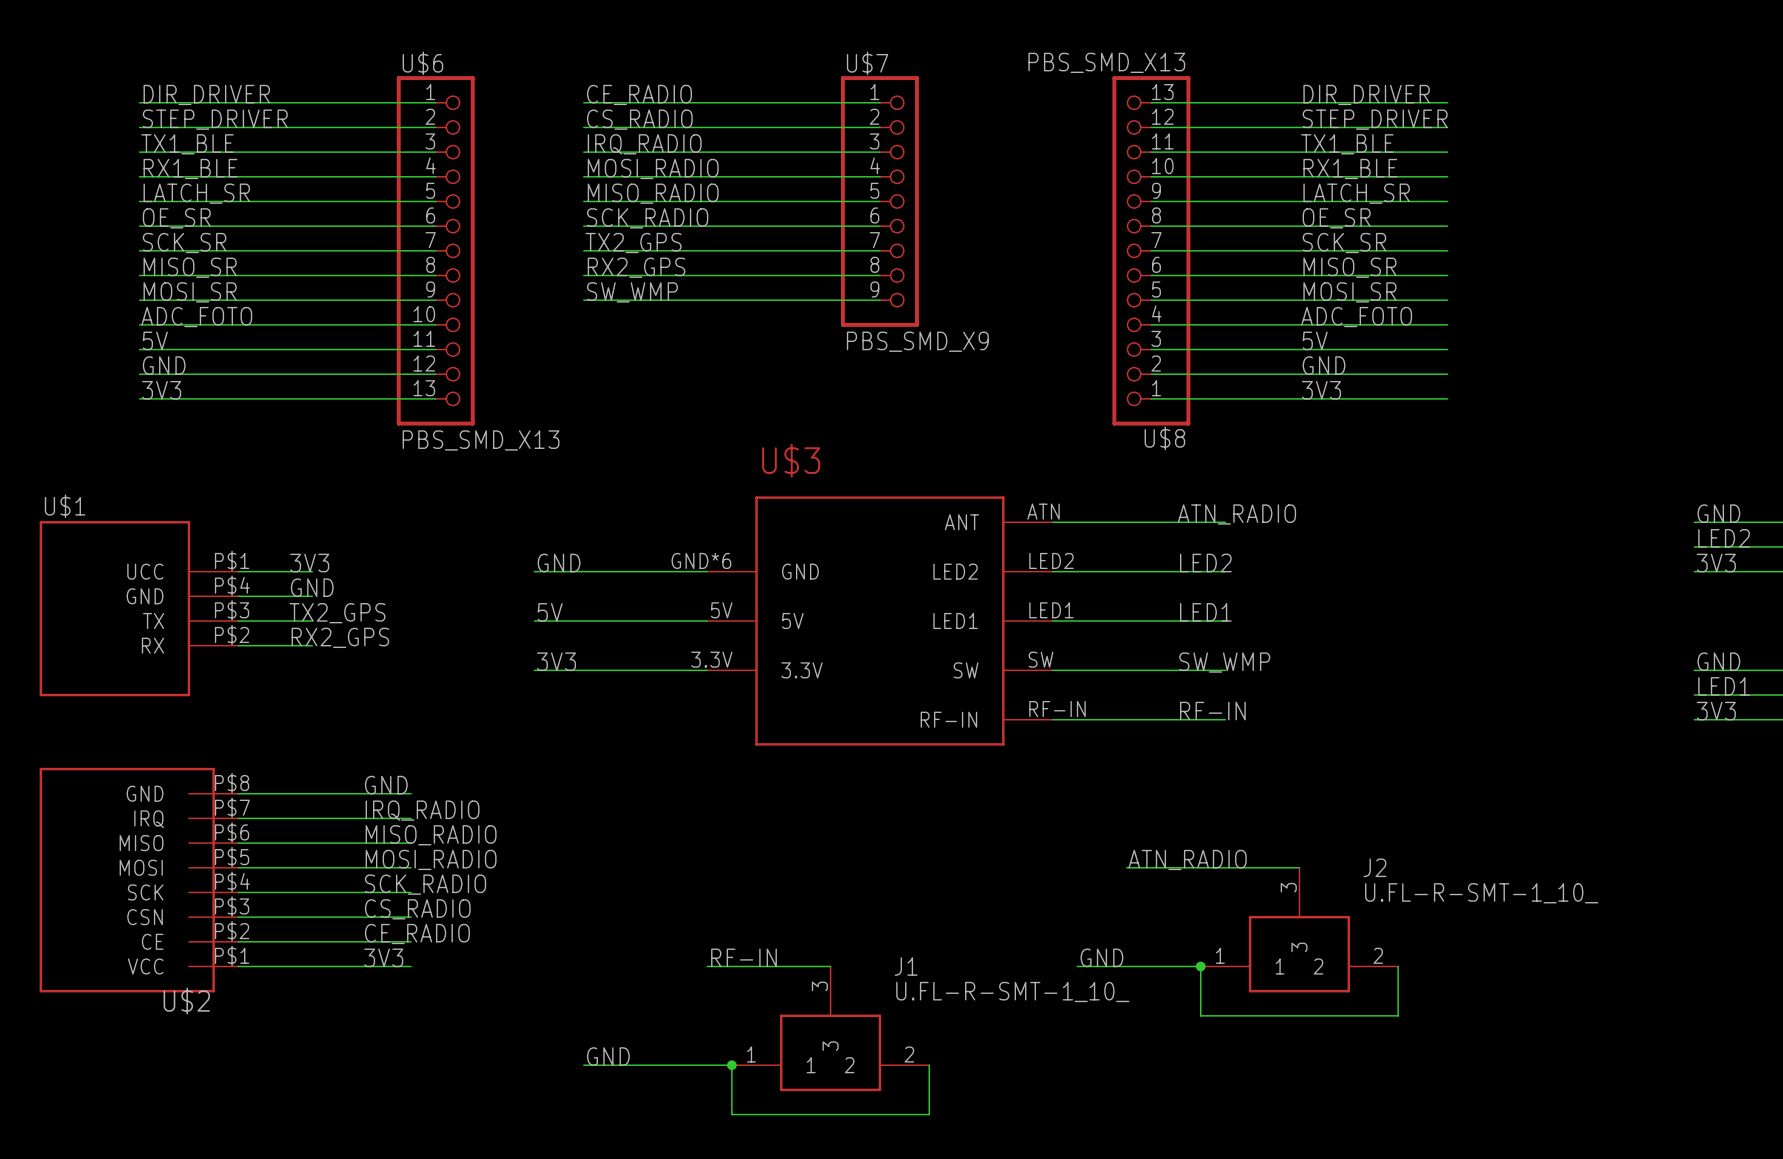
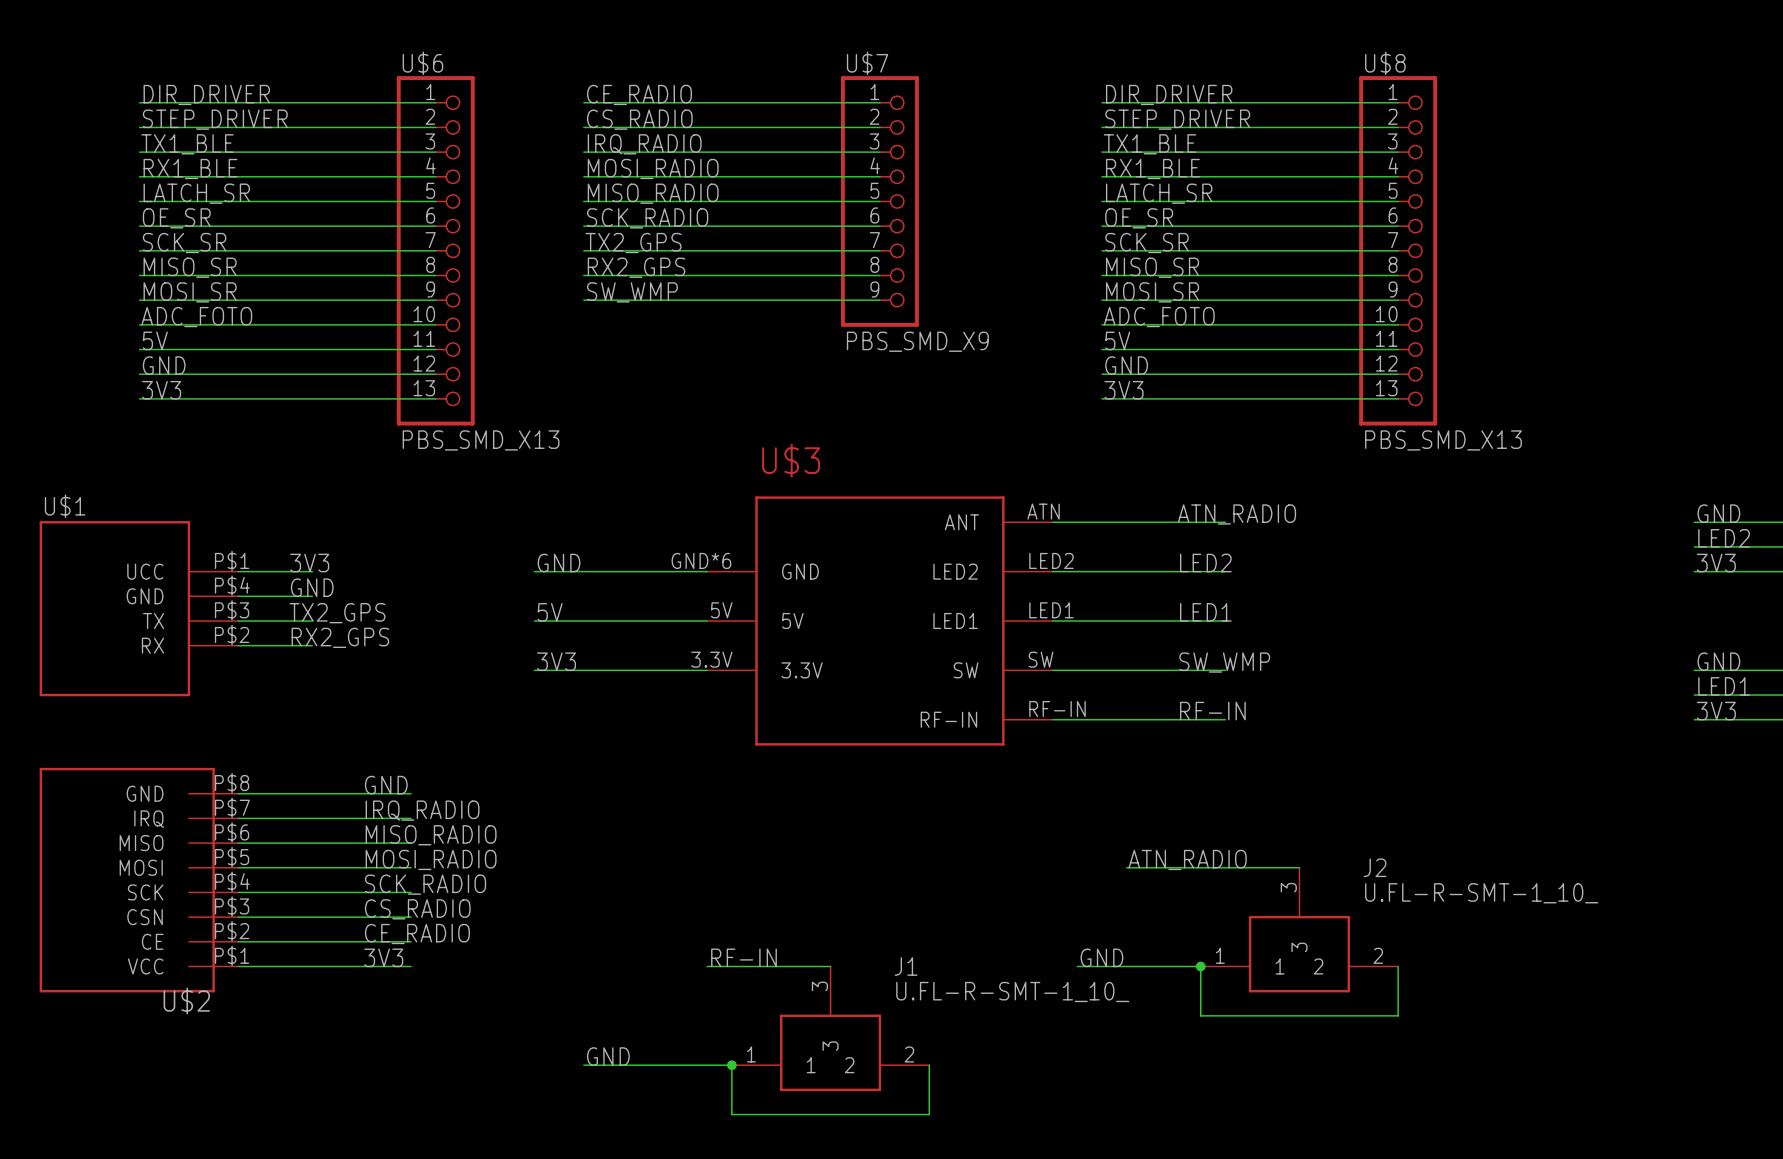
label position: DIR_DRIVER (1366, 94) -> DIR_DRIVER (1169, 94)
wire: none -> (1102, 102) (1151, 102)
wire: (1398, 102) (1447, 102) -> none
label position: STEP_DRIVER (1375, 119) -> STEP_DRIVER (1177, 119)
wire: none -> (1102, 127) (1151, 127)
wire: (1398, 127) (1447, 127) -> none
label position: TX1_BLE (1347, 144) -> TX1_BLE (1149, 144)
wire: none -> (1102, 152) (1151, 152)
wire: (1398, 152) (1447, 152) -> none
label position: RX1_BLE (1350, 168) -> RX1_BLE (1152, 168)
wire: none -> (1102, 176) (1151, 176)
wire: (1398, 176) (1447, 176) -> none
label position: LATCH_SR (1356, 193) -> LATCH_SR (1159, 193)
wire: none -> (1102, 201) (1151, 201)
wire: (1398, 201) (1447, 201) -> none
label position: OE_SR (1336, 218) -> OE_SR (1139, 218)
wire: none -> (1102, 226) (1151, 226)
wire: (1398, 226) (1447, 226) -> none
label position: SCK_SR (1344, 243) -> SCK_SR (1146, 243)
wire: none -> (1102, 250) (1151, 250)
U$8 rotation: 0° (1151, 250) -> 180° (1398, 250)
U$8 position: (1151, 250) -> (1398, 250)
wire: (1398, 250) (1447, 250) -> none
label position: MISO_SR (1349, 267) -> MISO_SR (1152, 267)
wire: none -> (1102, 275) (1151, 275)
wire: (1398, 275) (1447, 275) -> none
label position: MOSI_SR (1349, 292) -> MOSI_SR (1152, 292)
wire: none -> (1102, 300) (1151, 300)
wire: (1398, 300) (1447, 300) -> none
label position: ADC_FOTO (1356, 317) -> ADC_FOTO (1159, 317)
wire: none -> (1102, 324) (1151, 324)
wire: (1398, 324) (1447, 324) -> none
label position: 5V (1315, 340) -> 5V (1117, 340)
wire: none -> (1102, 349) (1151, 349)
wire: (1398, 349) (1447, 349) -> none
label position: GND (1324, 365) -> GND (1126, 365)
wire: none -> (1102, 374) (1151, 374)
wire: (1398, 374) (1447, 374) -> none
label position: 3V3 (1321, 390) -> 3V3 (1124, 390)
wire: none -> (1102, 398) (1151, 398)
wire: (1398, 398) (1447, 398) -> none

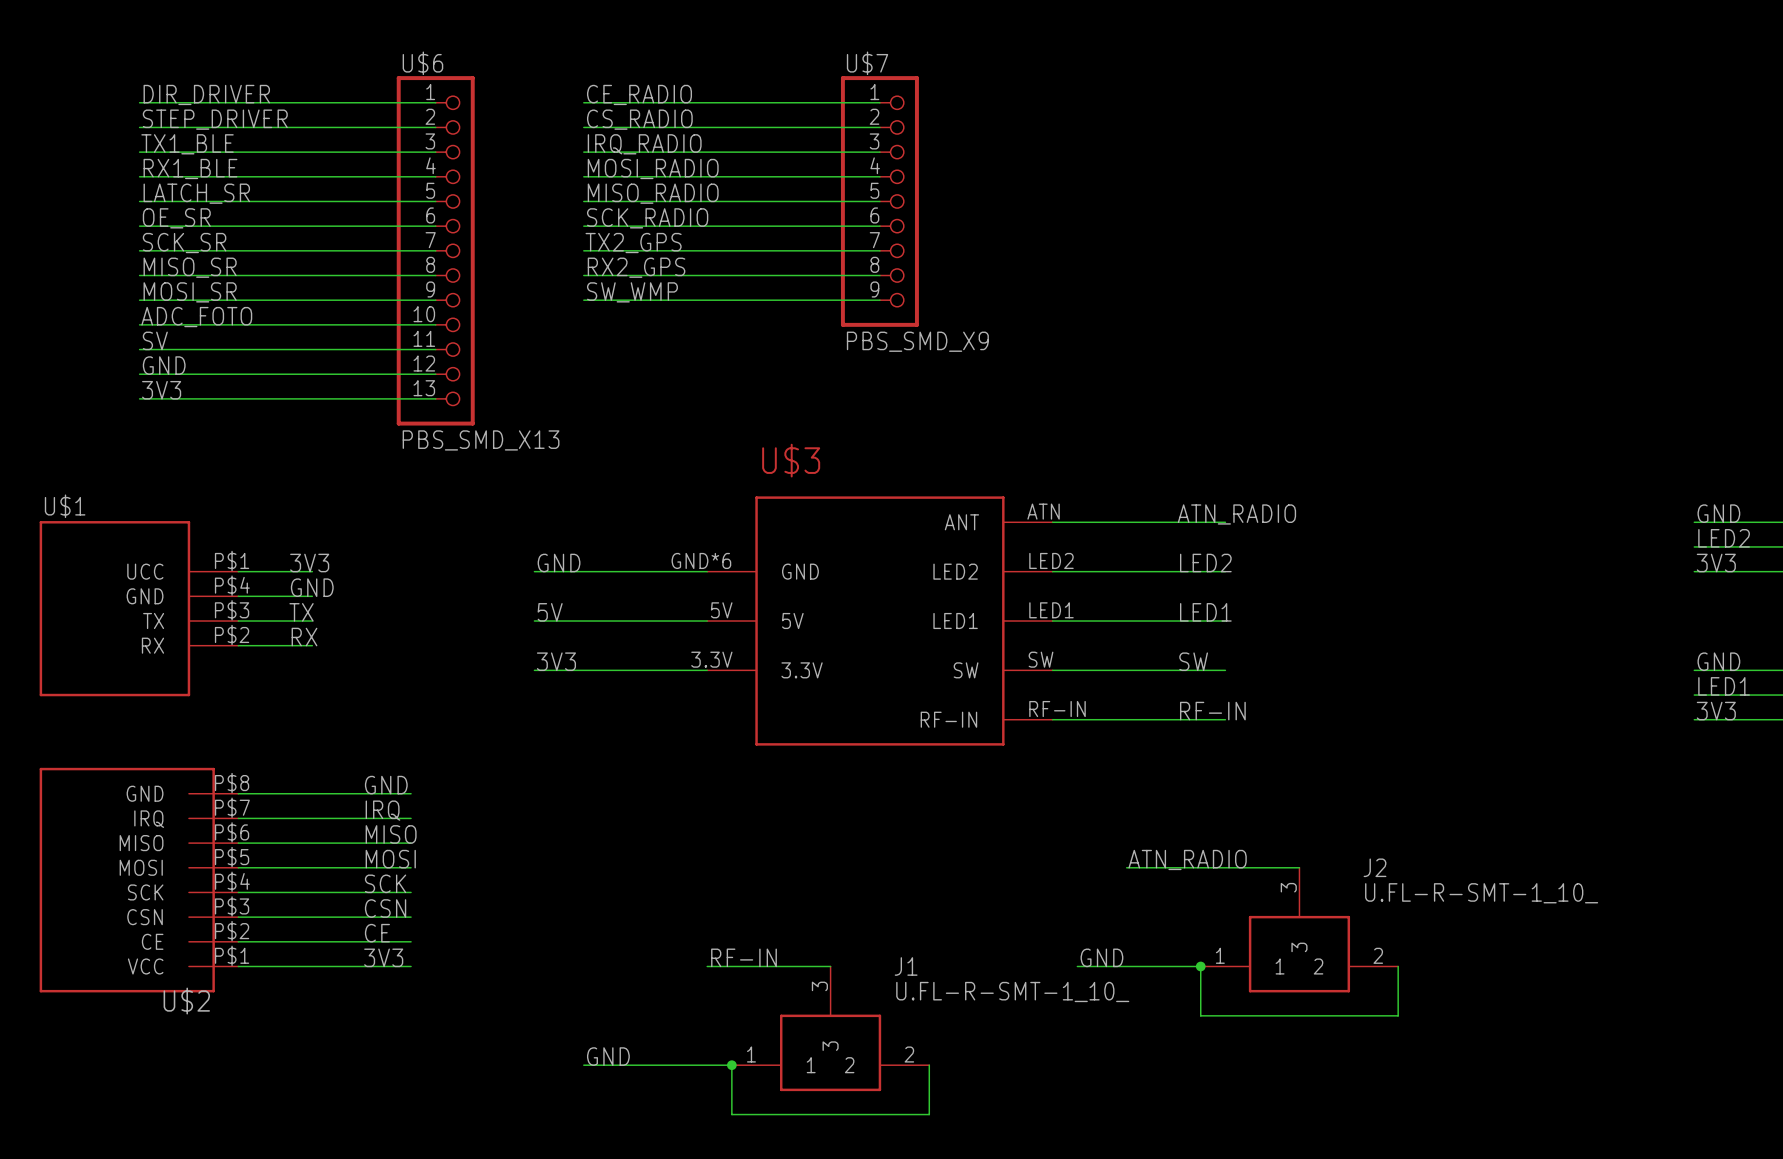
label: DIR_DRIVER (1169, 94) -> none
wire: (1102, 102) (1398, 102) -> none
label: STEP_DRIVER (1177, 119) -> none
wire: (1102, 127) (1398, 127) -> none
label: TX1_BLE (1149, 144) -> none
wire: (1102, 152) (1398, 152) -> none
label: RX1_BLE (1152, 168) -> none
wire: (1102, 176) (1398, 176) -> none
label: LATCH_SR (1159, 193) -> none
wire: (1102, 201) (1398, 201) -> none
label: OE_SR (1139, 218) -> none
wire: (1102, 226) (1398, 226) -> none
label: SCK_SR (1146, 243) -> none
wire: (1102, 250) (1398, 250) -> none
U$8: PBS_SMD_X13 (1398, 250) -> none
label: MISO_SR (1152, 267) -> none
wire: (1102, 275) (1398, 275) -> none
label: MOSI_SR (1152, 292) -> none
wire: (1102, 300) (1398, 300) -> none
label: ADC_FOTO (1159, 317) -> none
wire: (1102, 324) (1398, 324) -> none
label: 5V (155, 340) -> SV (155, 340)
label: 5V (1117, 340) -> none
wire: (1102, 349) (1398, 349) -> none
label: GND (1126, 365) -> none
wire: (1102, 374) (1398, 374) -> none
label: 3V3 (1124, 390) -> none
wire: (1102, 398) (1398, 398) -> none
label: TX2_GPS (337, 613) -> TX (301, 612)
label: RX2_GPS (340, 637) -> RX (304, 637)
label: SW_WMP (1224, 662) -> SW (1193, 661)
label: IRQ_RADIO (422, 810) -> IRQ (382, 810)
label: MISO_RADIO (431, 835) -> MISO (391, 834)
label: MOSI_RADIO (431, 859) -> MOSI (390, 859)
label: SCK_RADIO (425, 884) -> SCK (385, 883)
label: CS_RADIO (417, 909) -> CSN (385, 908)
label: CE_RADIO (417, 933) -> CE (377, 933)

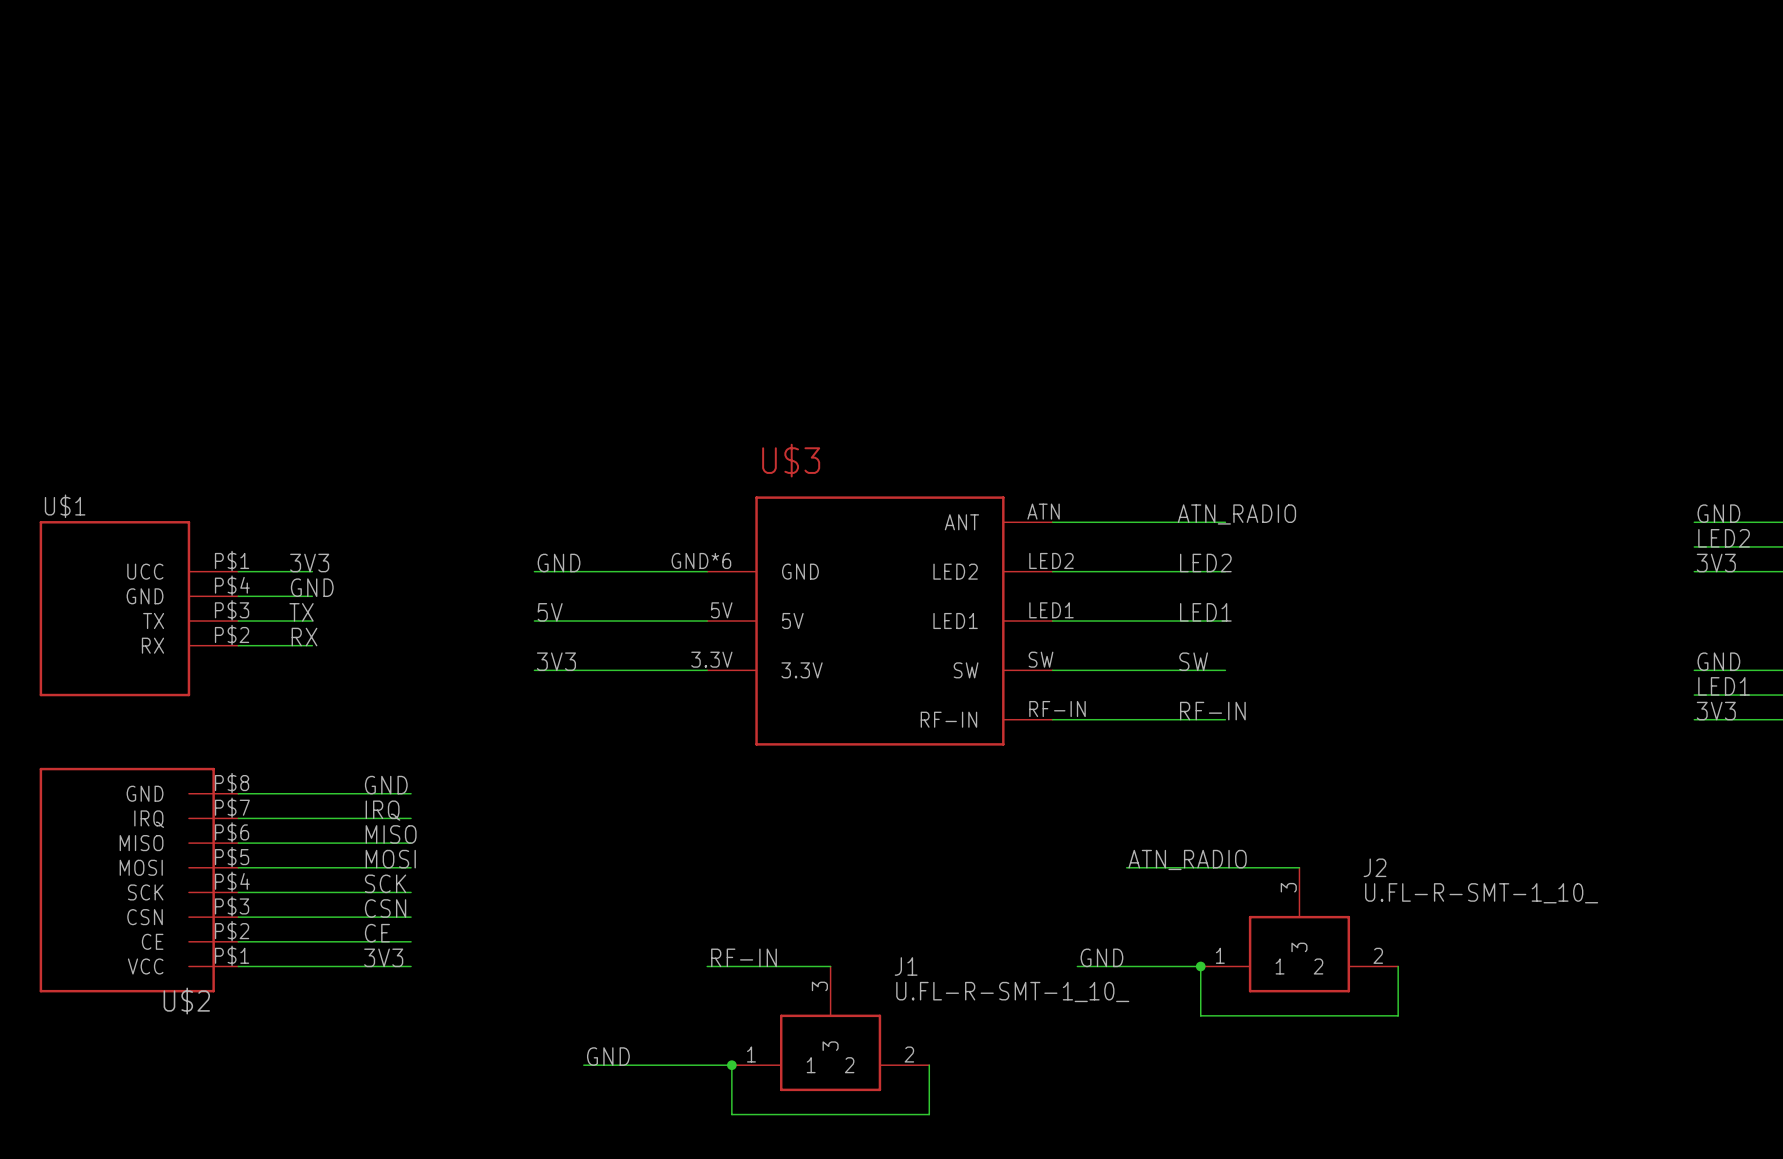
label: DIR_DRIVER (206, 94) -> none
label: CE_RADIO (639, 94) -> none
wire: (139, 102) (435, 102) -> none
wire: (583, 102) (879, 102) -> none
label: STEP_DRIVER (215, 119) -> none
label: CS_RADIO (639, 119) -> none
wire: (139, 127) (435, 127) -> none
wire: (583, 127) (879, 127) -> none
label: TX1_BLE (187, 144) -> none
label: IRQ_RADIO (644, 144) -> none
wire: (139, 152) (435, 152) -> none
wire: (583, 152) (879, 152) -> none
label: RX1_BLE (190, 168) -> none
label: MOSI_RADIO (653, 168) -> none
wire: (139, 176) (435, 176) -> none
wire: (583, 176) (879, 176) -> none
label: LATCH_SR (196, 193) -> none
label: MISO_RADIO (653, 193) -> none
wire: (139, 201) (435, 201) -> none
wire: (583, 201) (879, 201) -> none
U$7: PBS_SMD_X9 (879, 201) -> none
label: OE_SR (176, 218) -> none
label: SCK_RADIO (647, 218) -> none
wire: (139, 226) (435, 226) -> none
wire: (583, 226) (879, 226) -> none
label: SCK_SR (184, 243) -> none
label: TX2_GPS (633, 243) -> none
wire: (139, 250) (435, 250) -> none
U$6: PBS_SMD_X13 (435, 250) -> none
wire: (583, 250) (879, 250) -> none
label: MISO_SR (190, 267) -> none
label: RX2_GPS (636, 267) -> none
wire: (139, 275) (435, 275) -> none
wire: (583, 275) (879, 275) -> none
label: MOSI_SR (190, 292) -> none
label: SW_WMP (632, 292) -> none
wire: (139, 300) (435, 300) -> none
wire: (583, 300) (879, 300) -> none
label: ADC_FOTO (196, 317) -> none
wire: (139, 324) (435, 324) -> none
label: SV (155, 340) -> none
wire: (139, 349) (435, 349) -> none
label: GND (164, 365) -> none
wire: (139, 374) (435, 374) -> none
label: 3V3 (161, 390) -> none
wire: (139, 398) (435, 398) -> none

